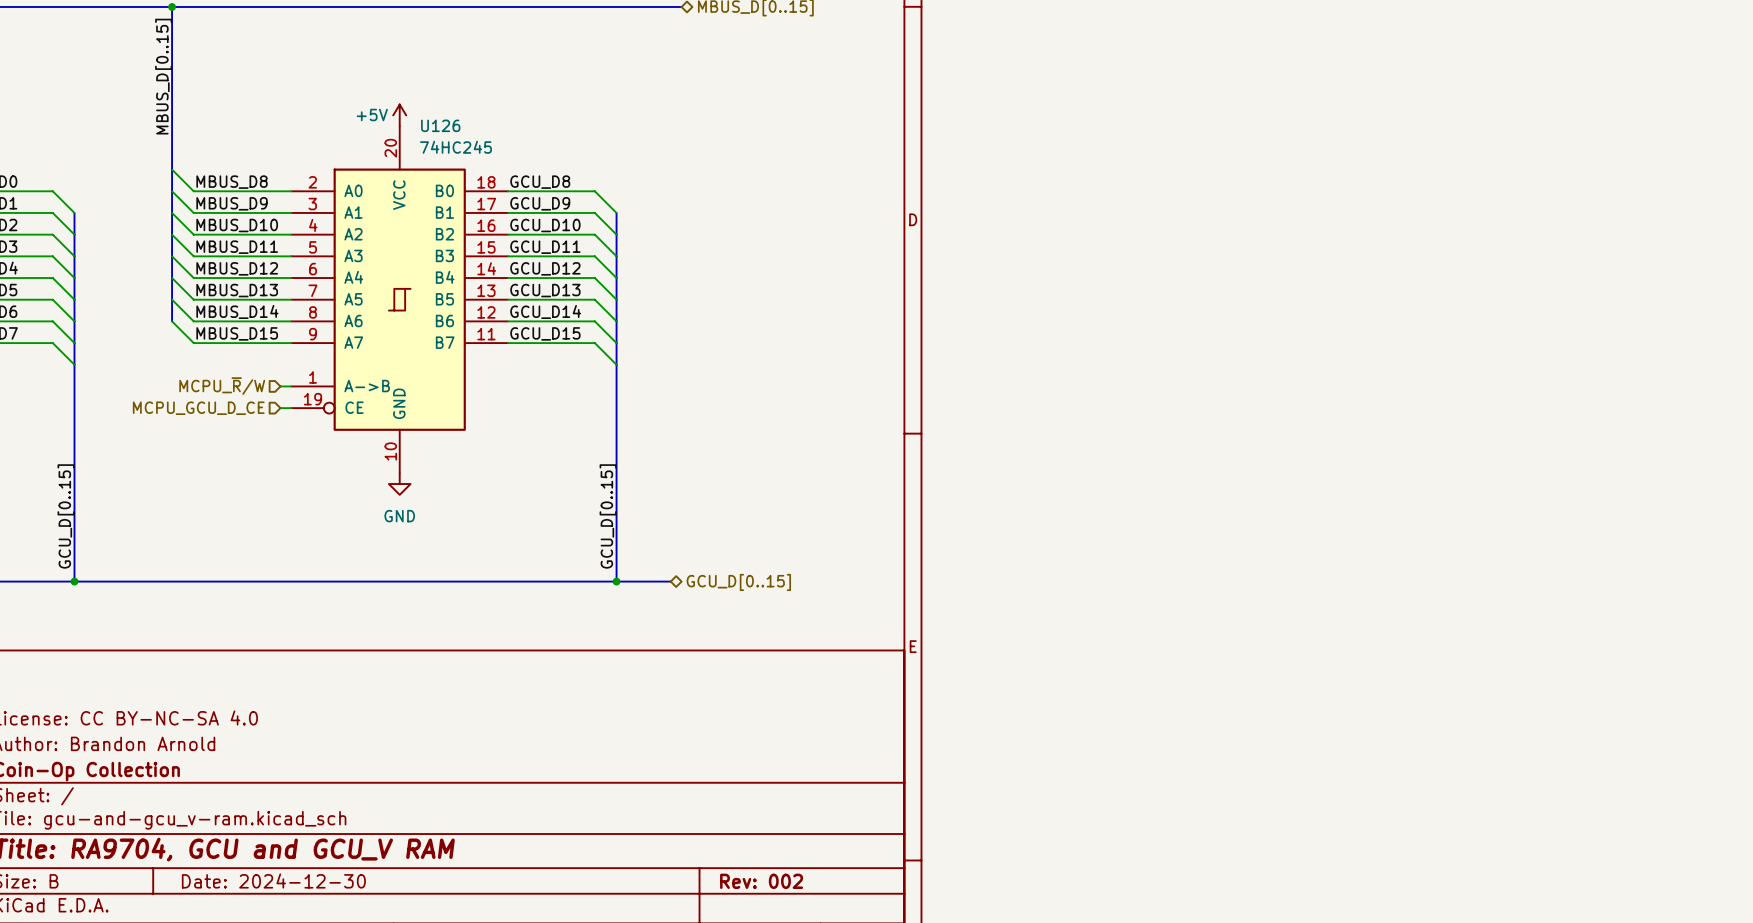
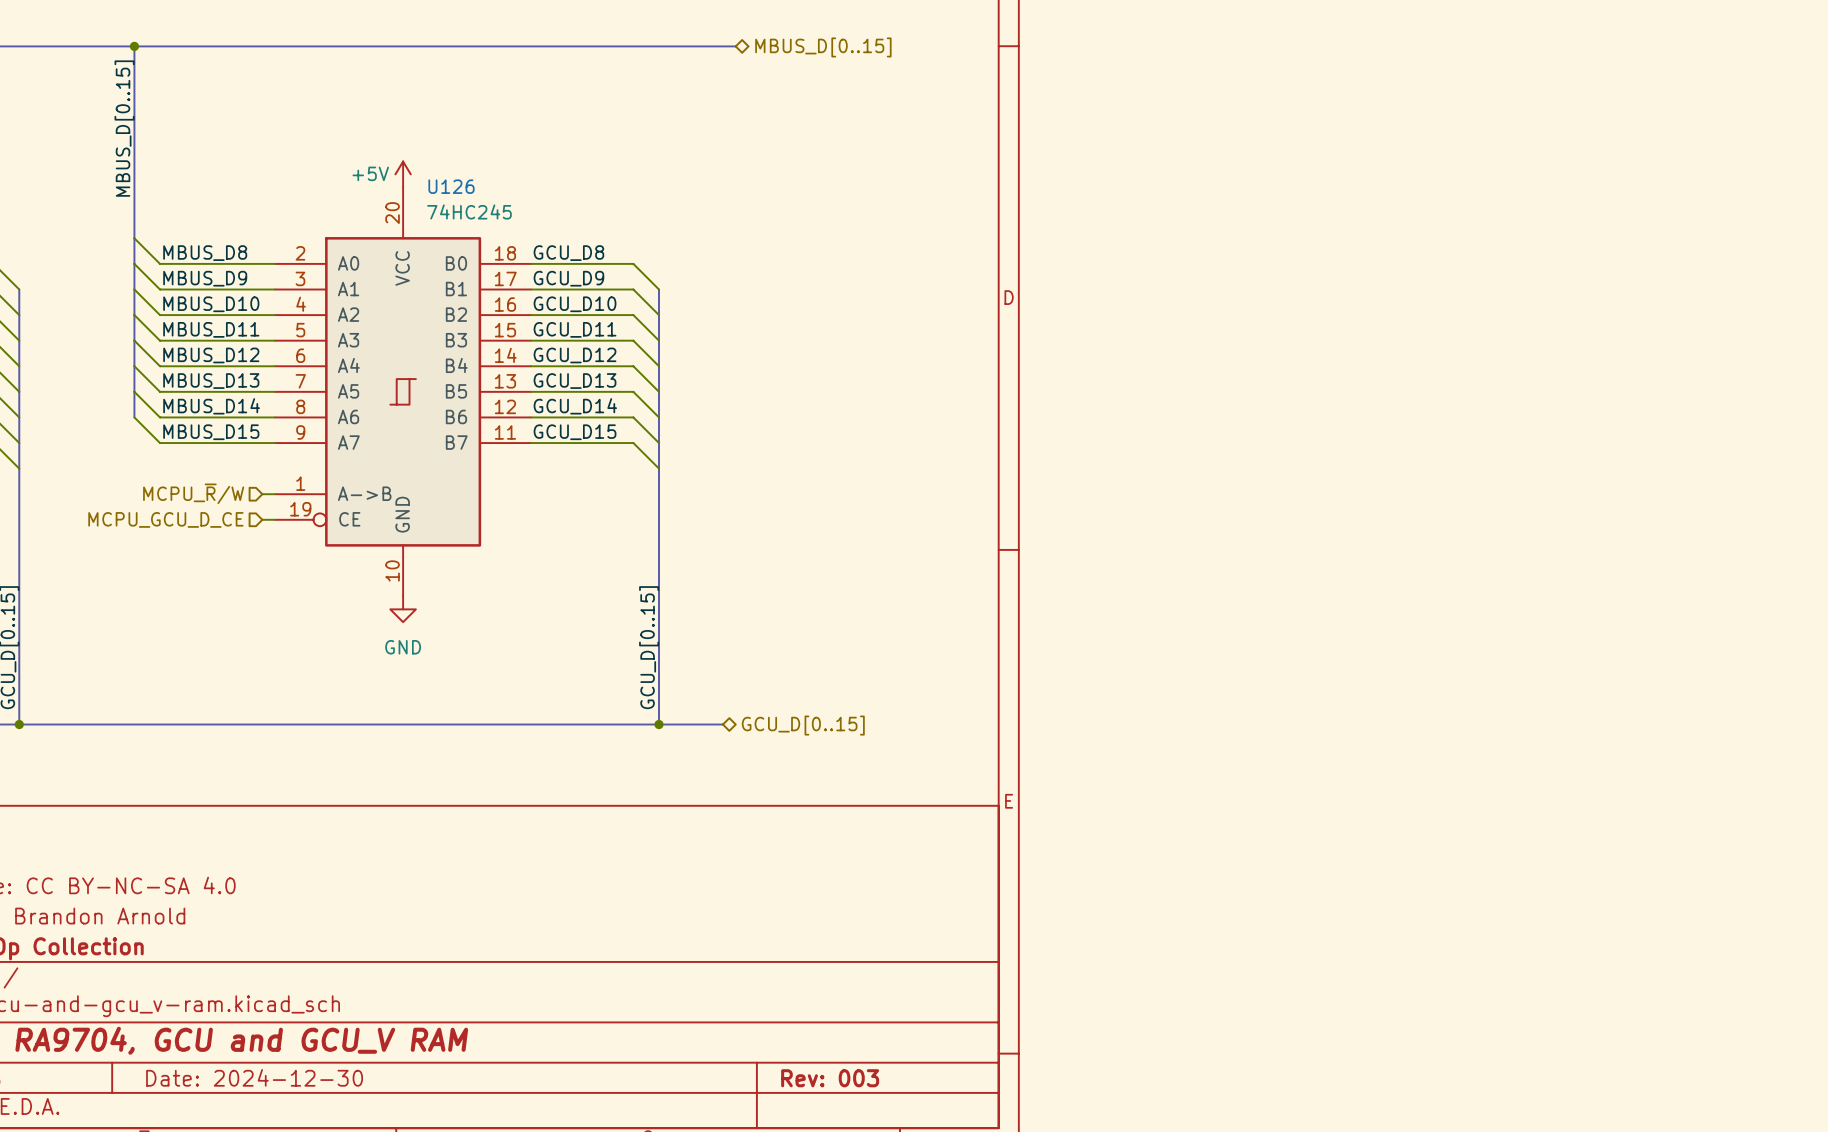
title block: Rev: 002 (761, 881) -> Rev: 003 (830, 1078)

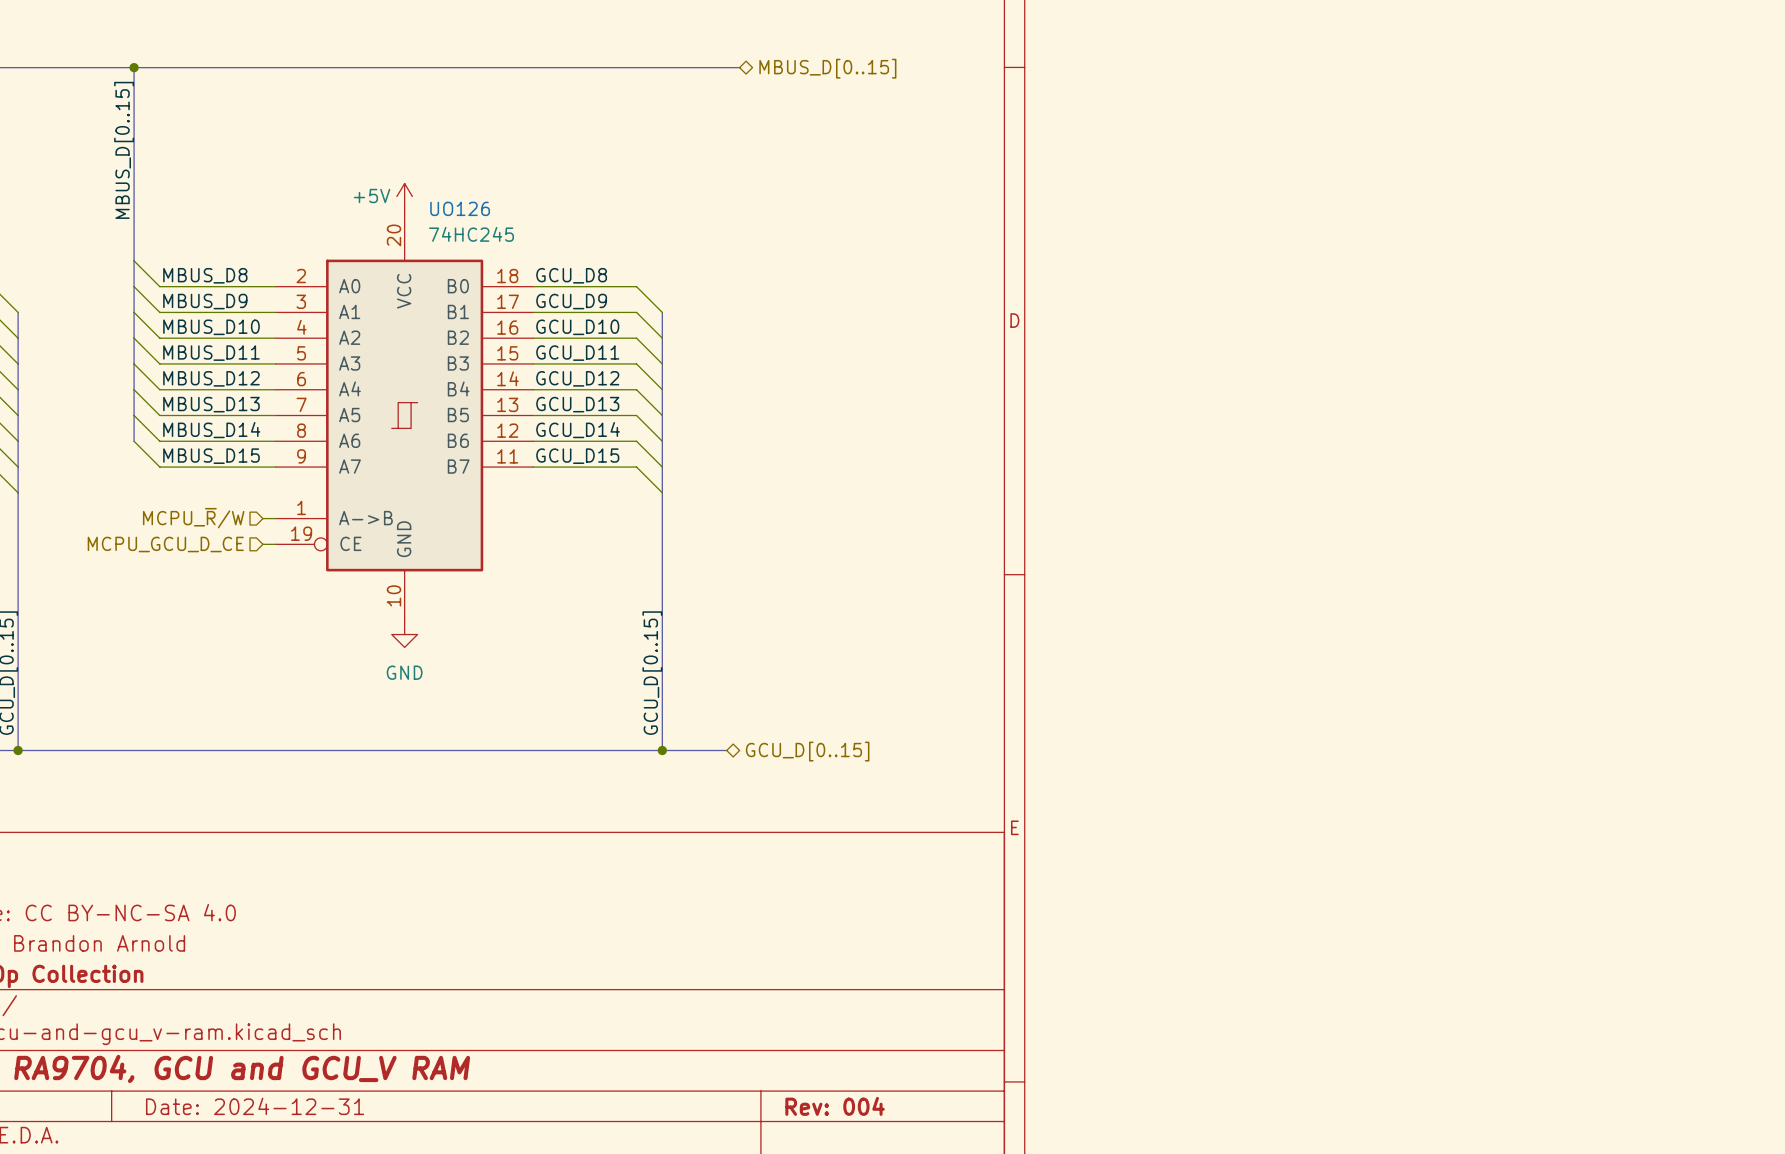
U126 name: U126 (451, 186) -> UO126 (460, 208)
title block: Date: 2024-12-30 (254, 1077) -> Date: 2024-12-31 (255, 1106)
title block: Rev: 003 (830, 1078) -> Rev: 004 (835, 1106)

